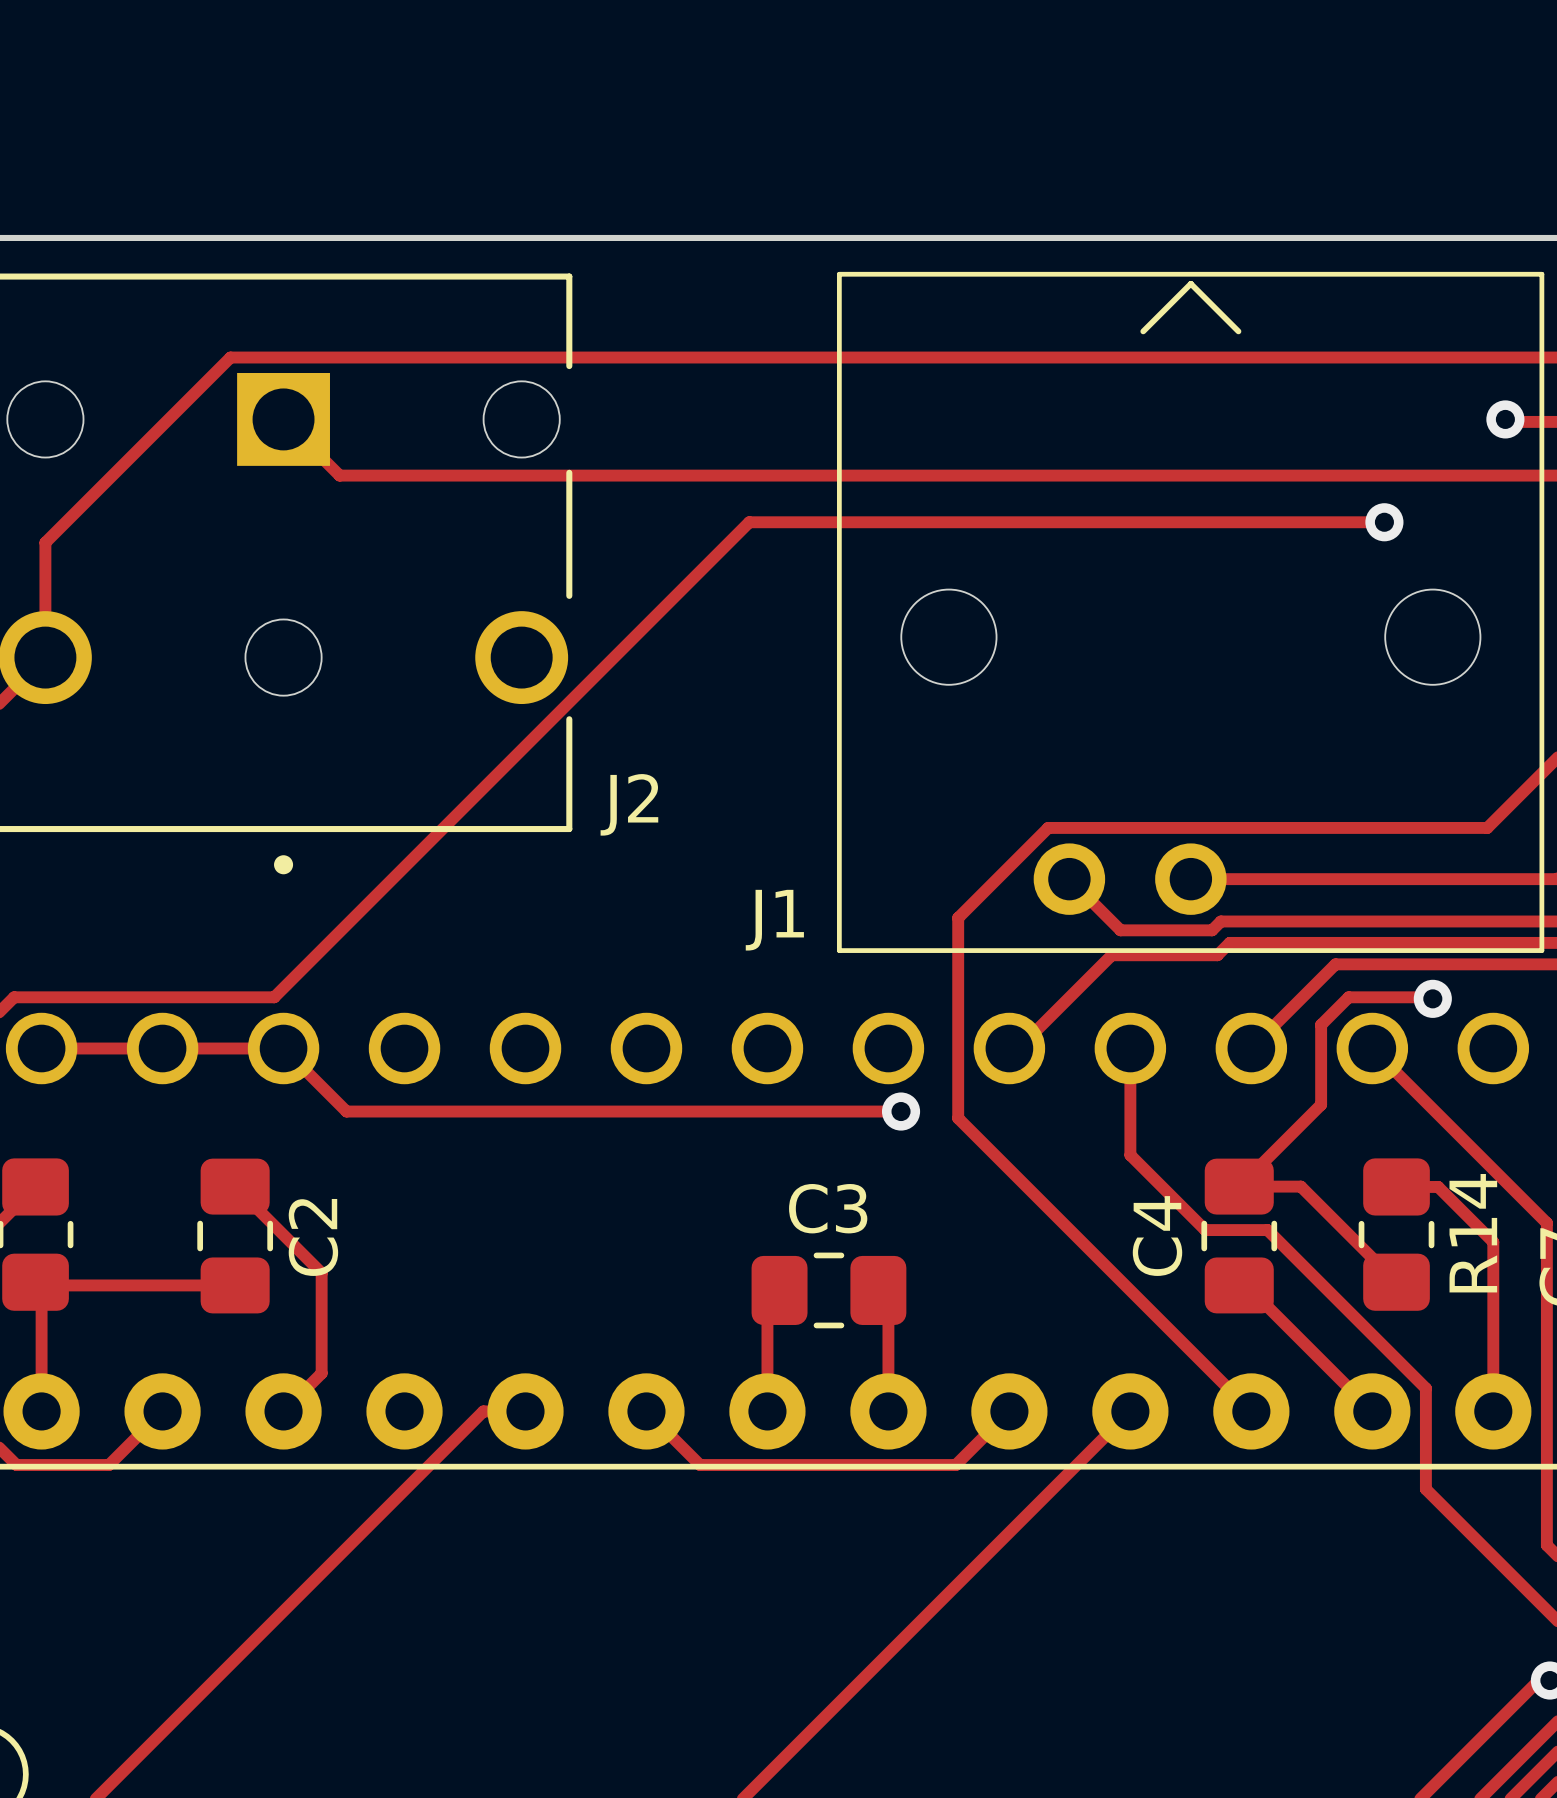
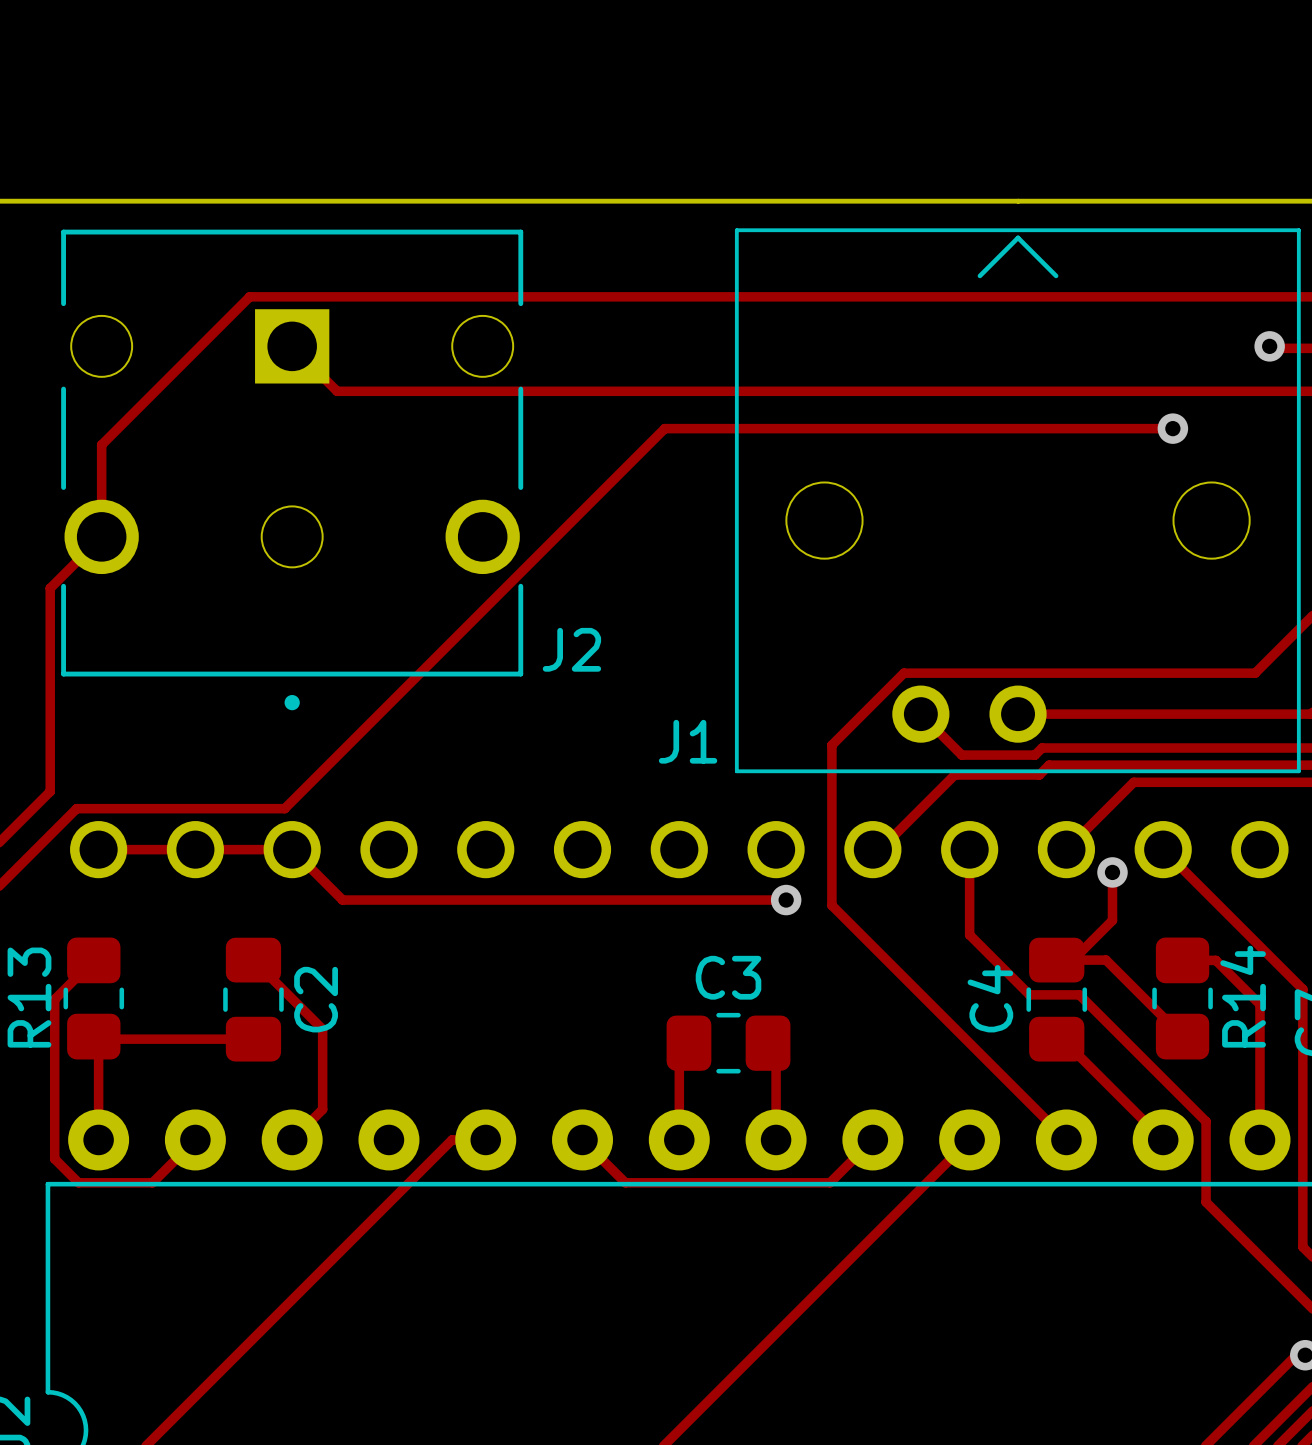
track: (1432, 998) (1431, 997) (1348, 997) (1321, 1024) (1321, 1104) (1239, 1186) -> none
via position: (1432, 998) -> (1112, 872)
track: none -> (1112, 872) (1112, 920) (1072, 960)

